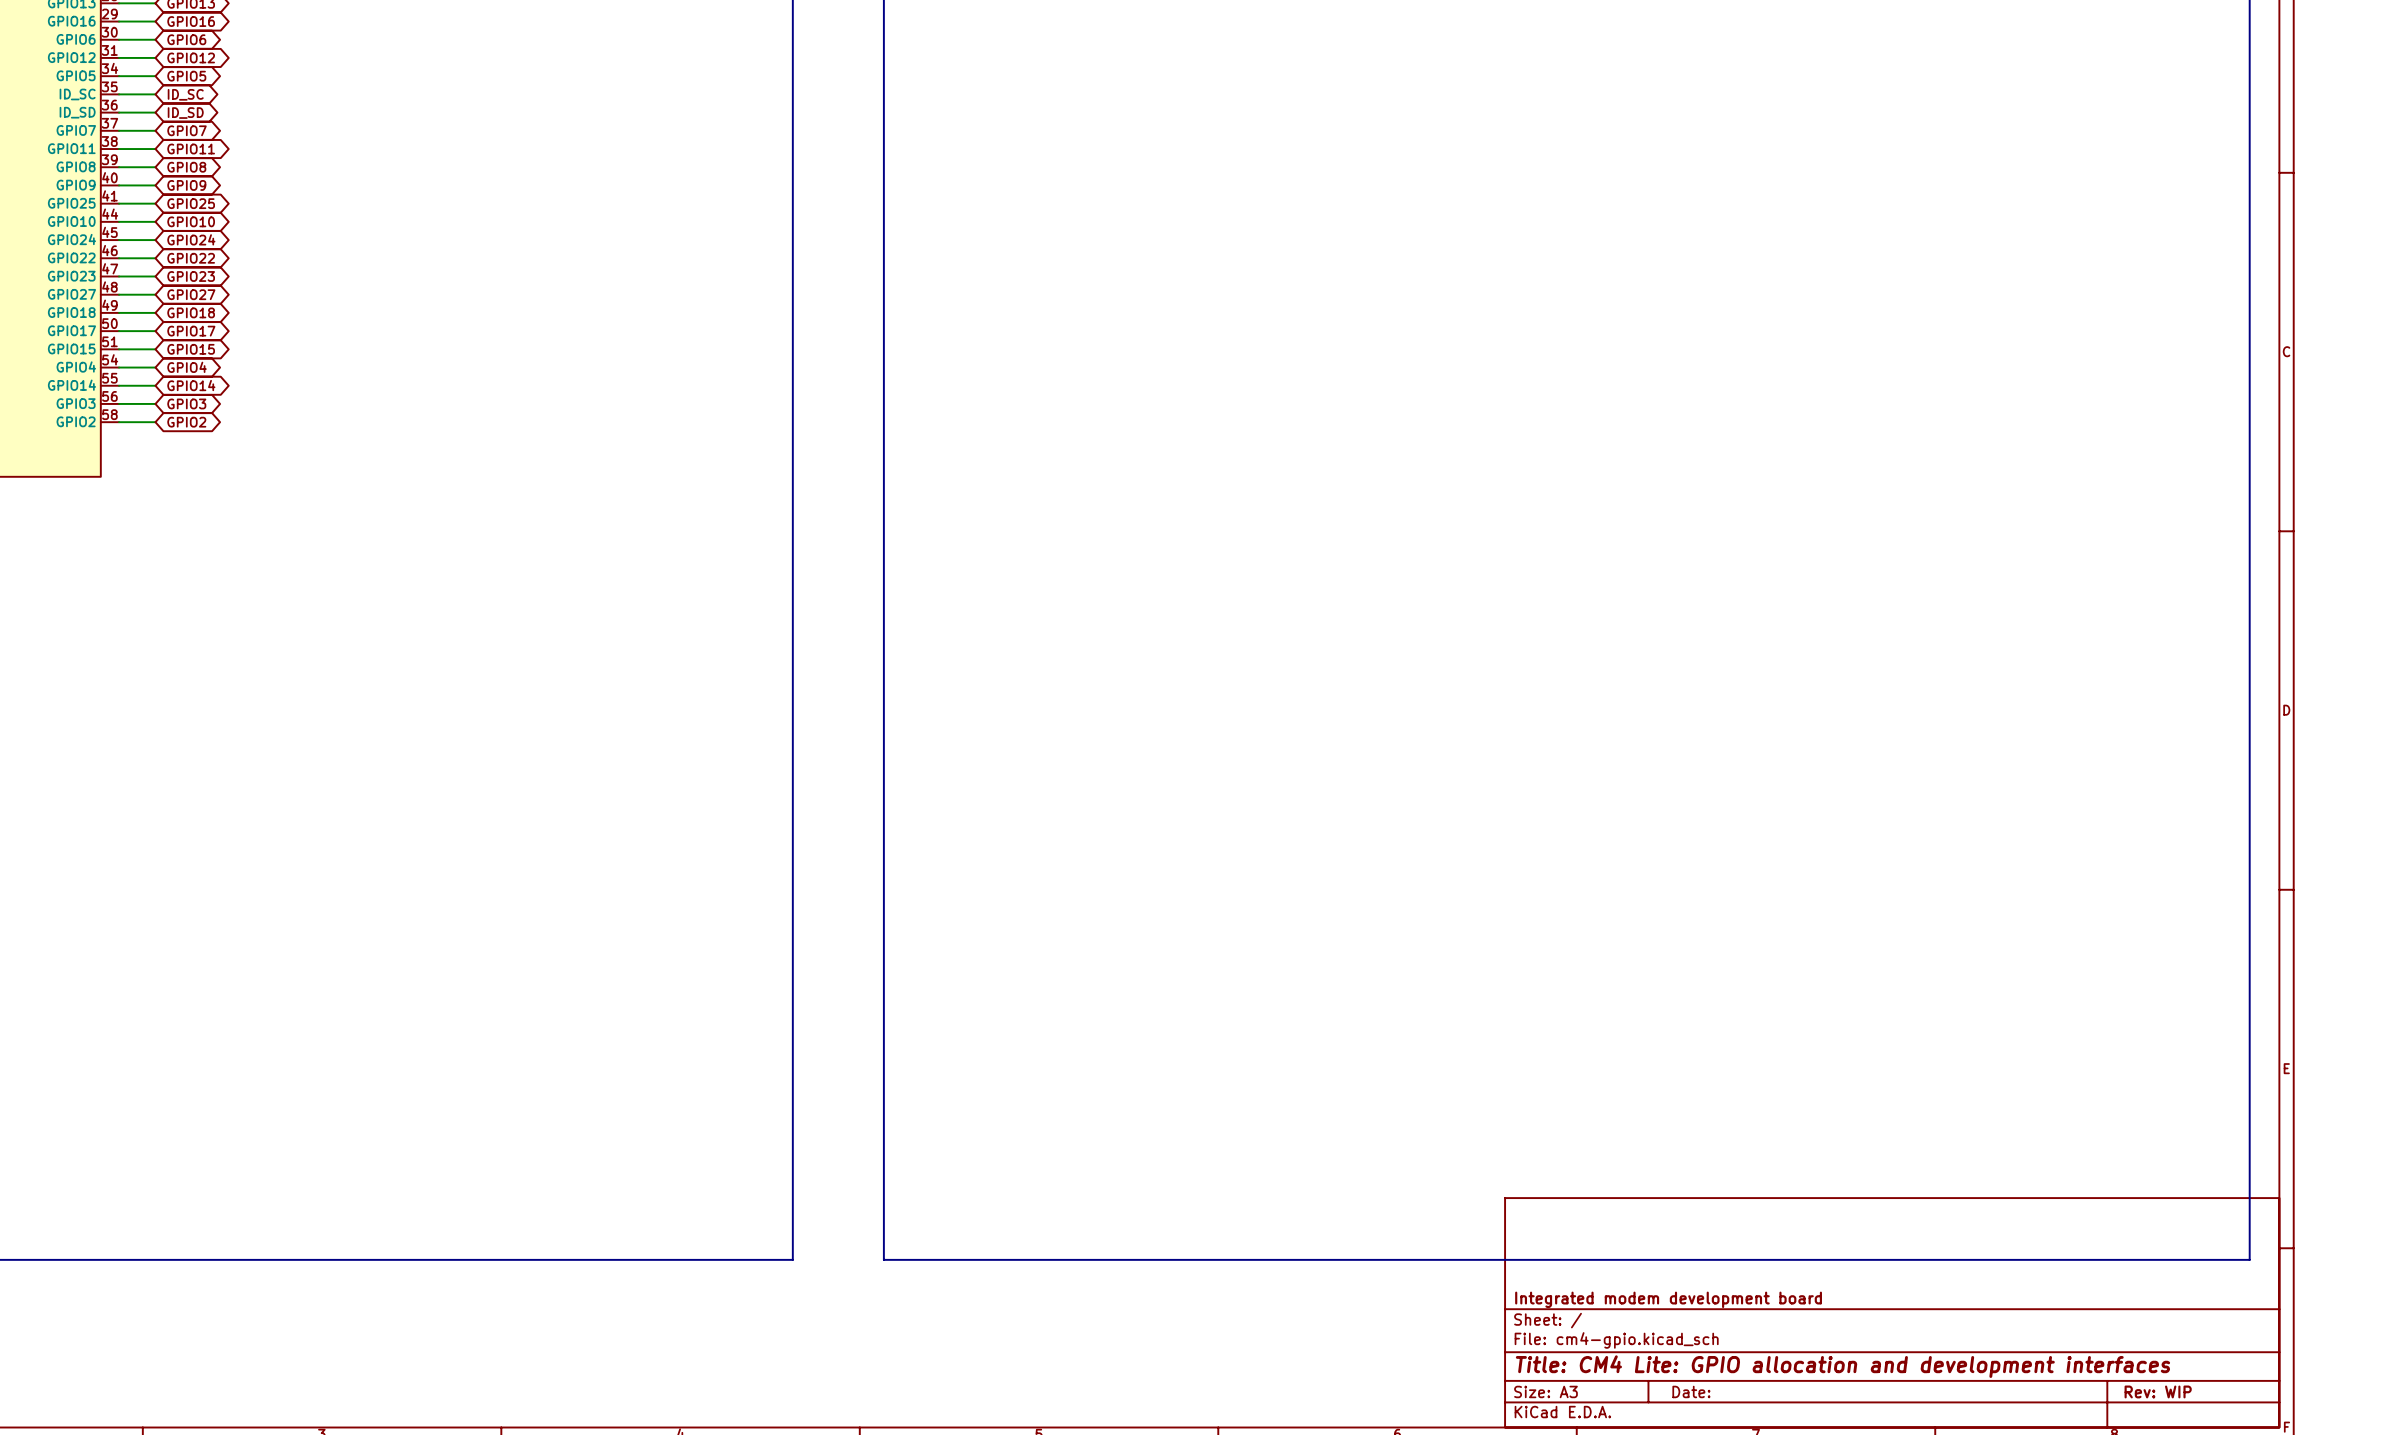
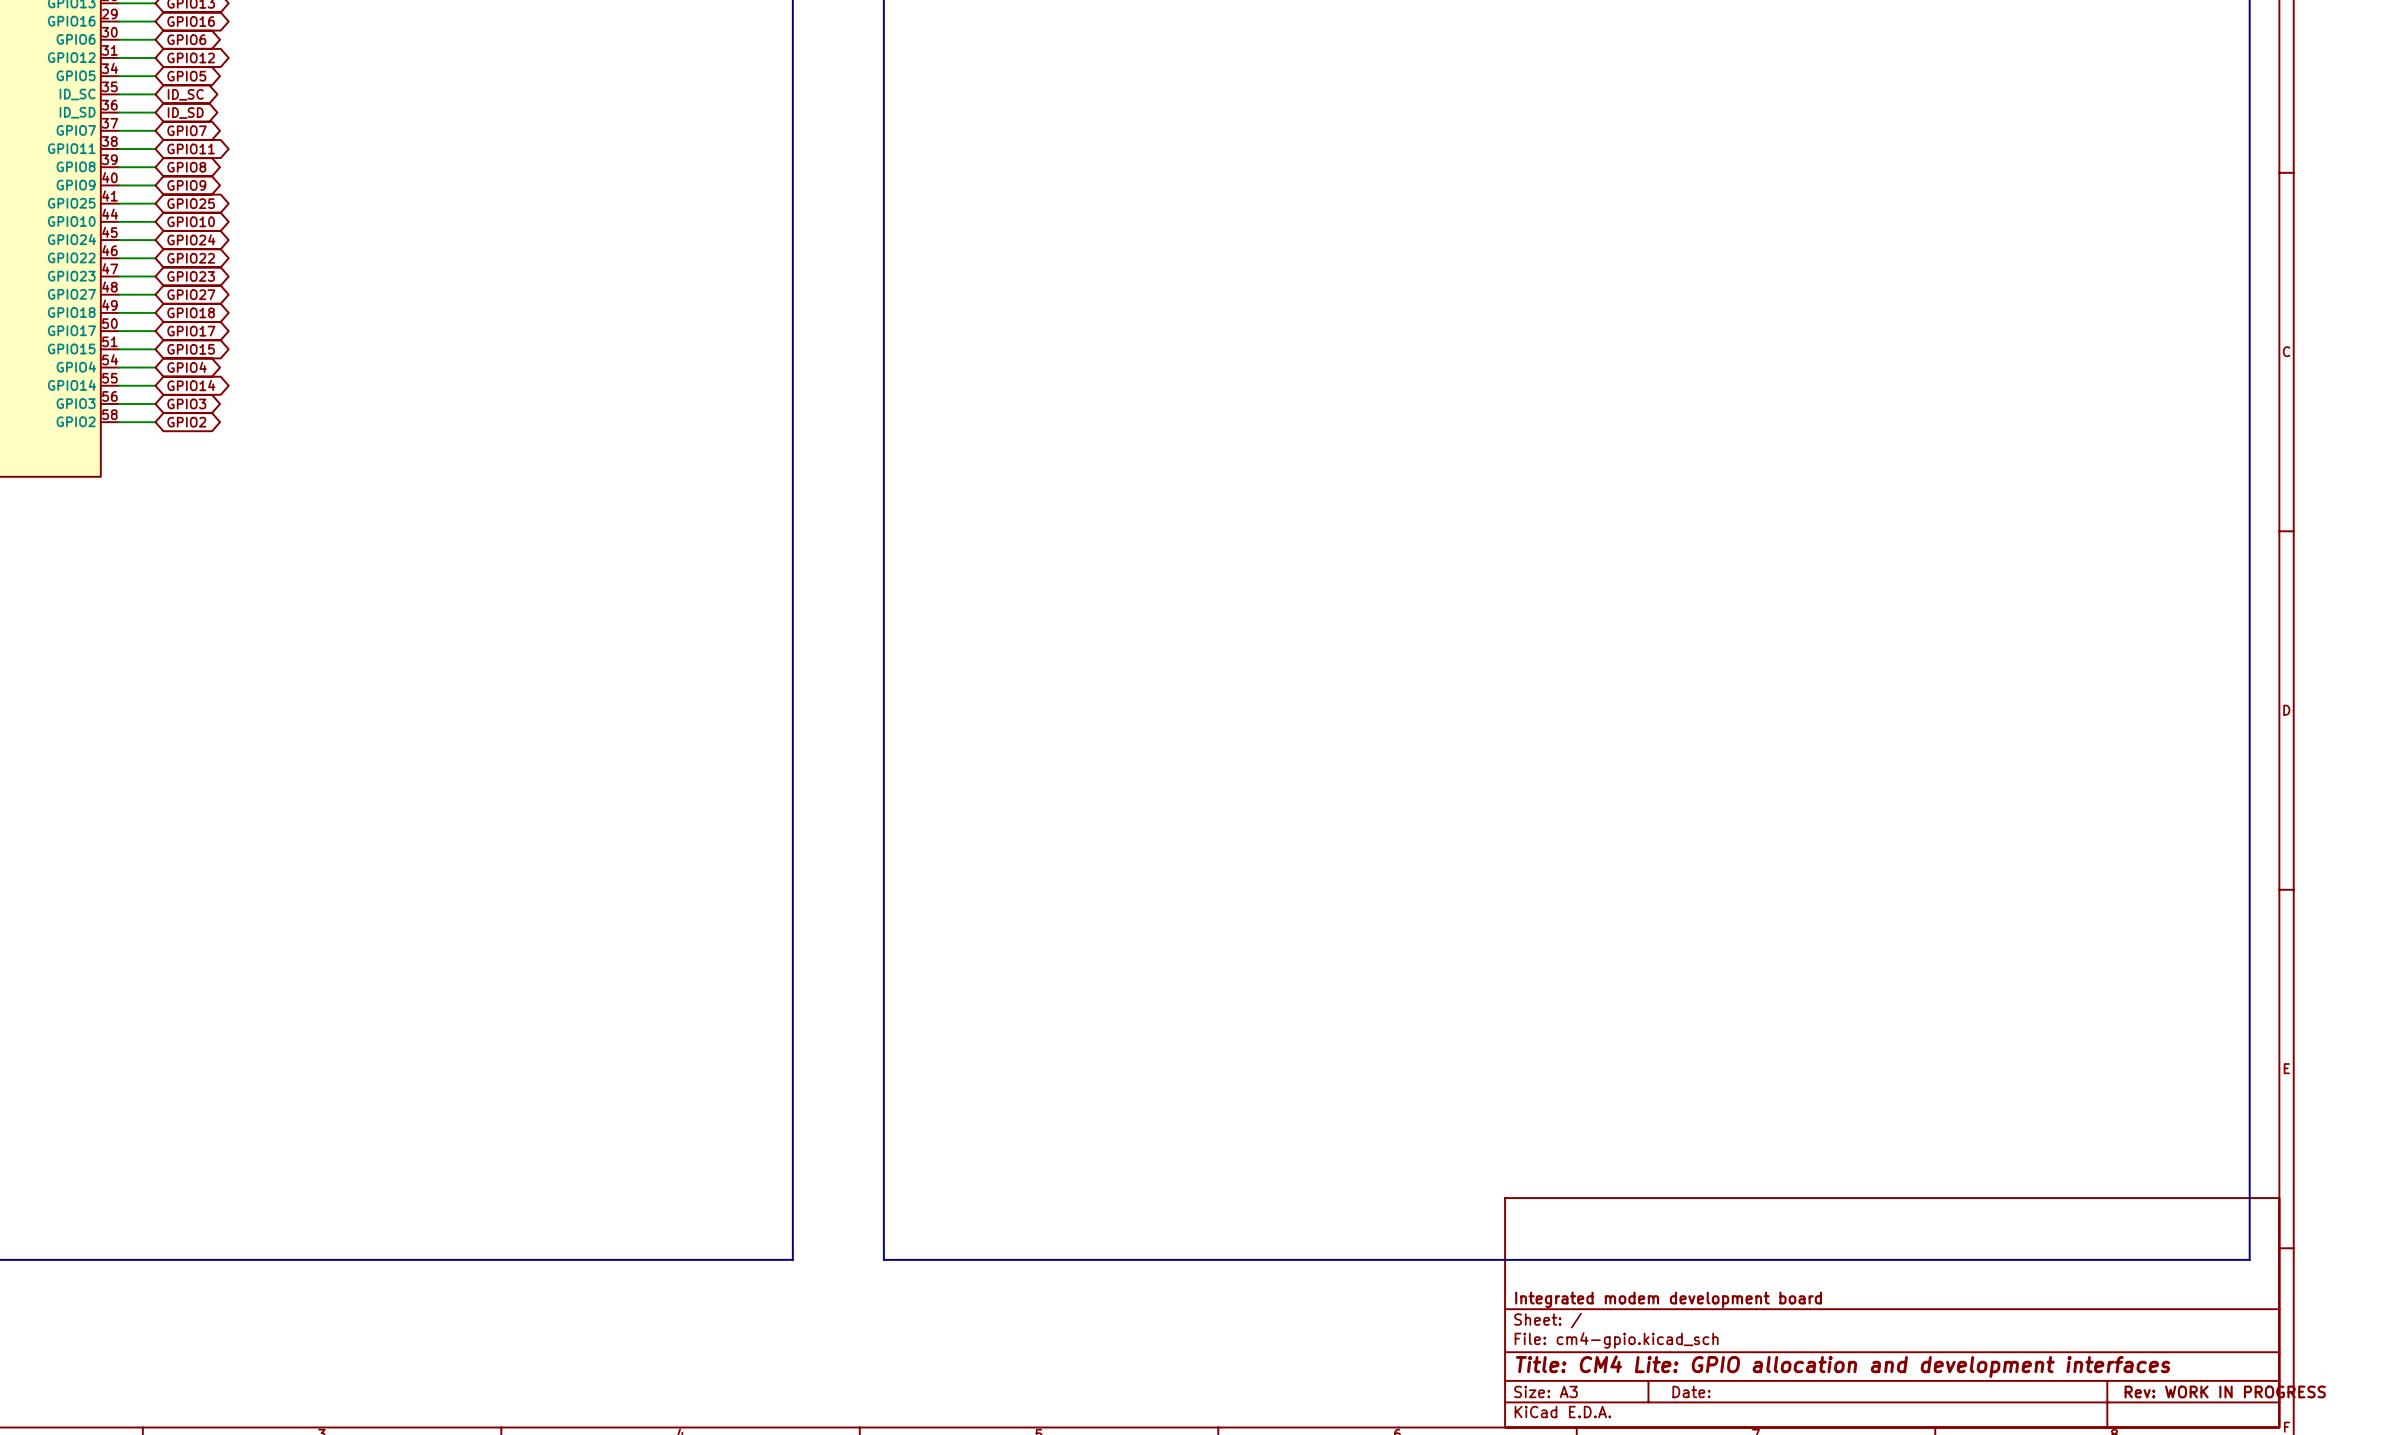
title block: Rev: WIP (2158, 1391) -> Rev: WORK IN PROGRESS (2225, 1391)

